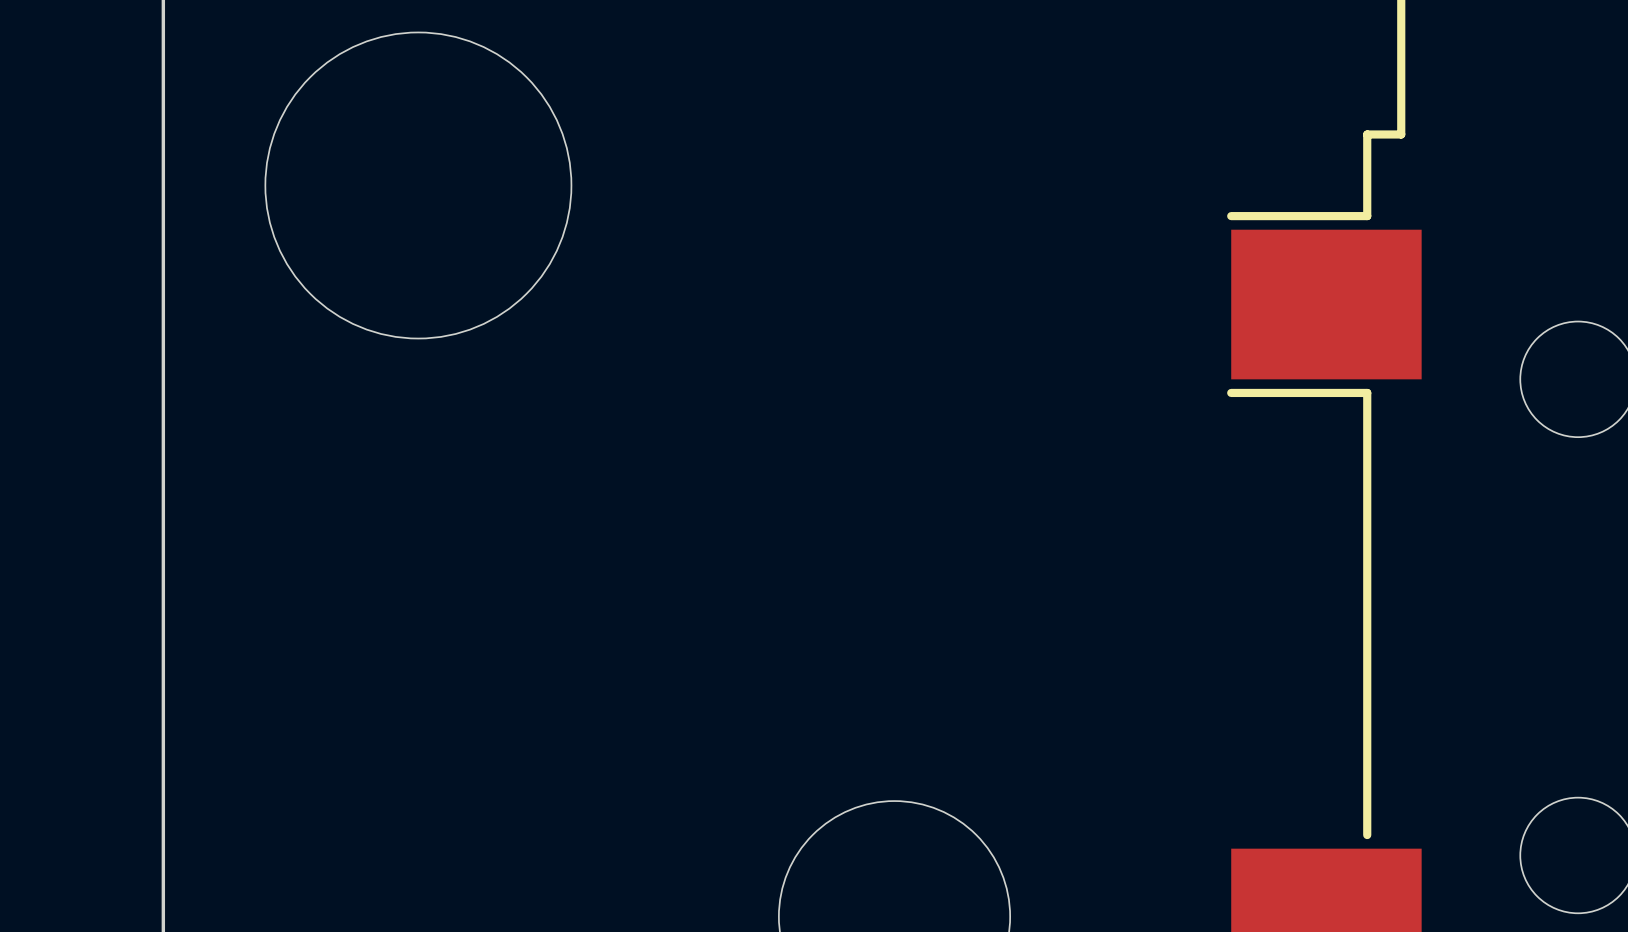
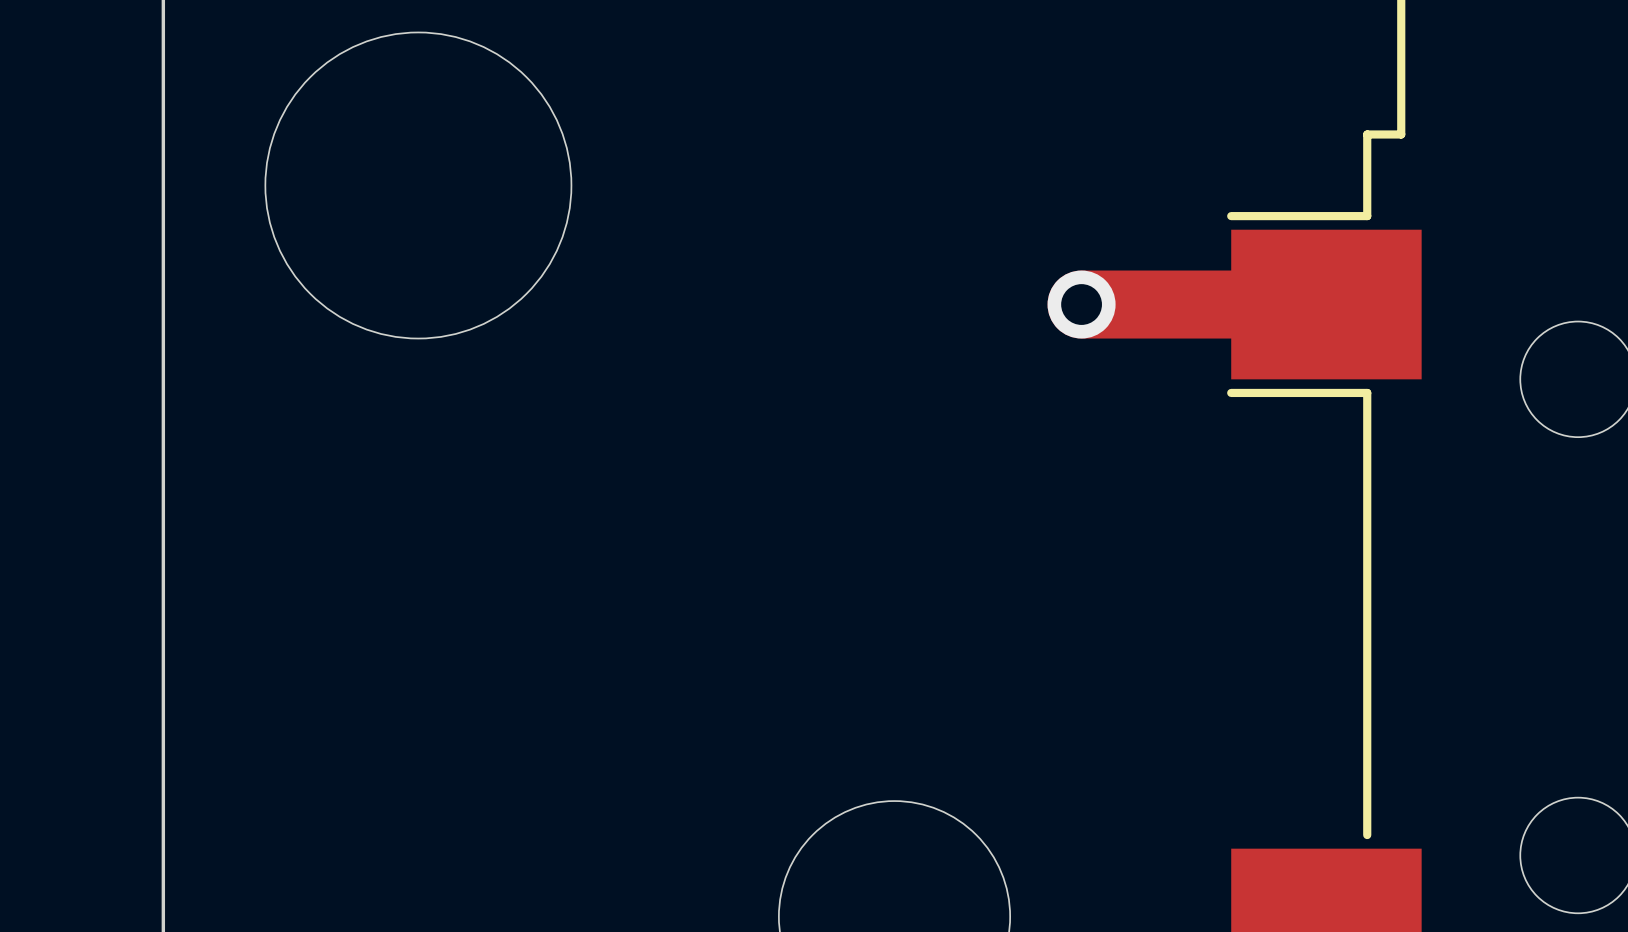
track: none -> (1081, 304) (1326, 304)
via: none -> (1081, 304)

